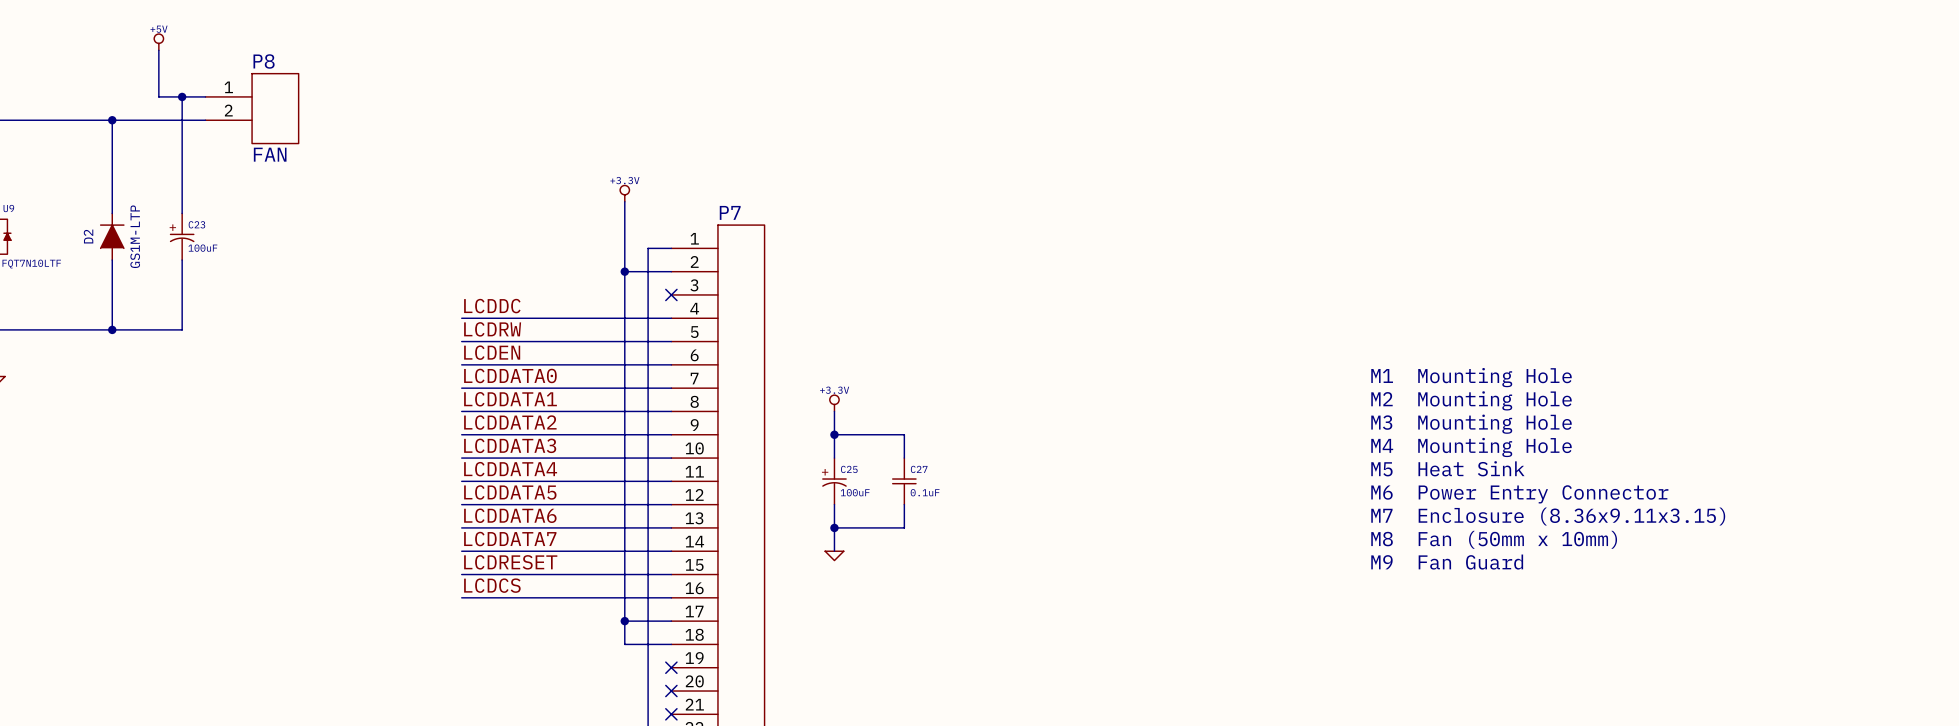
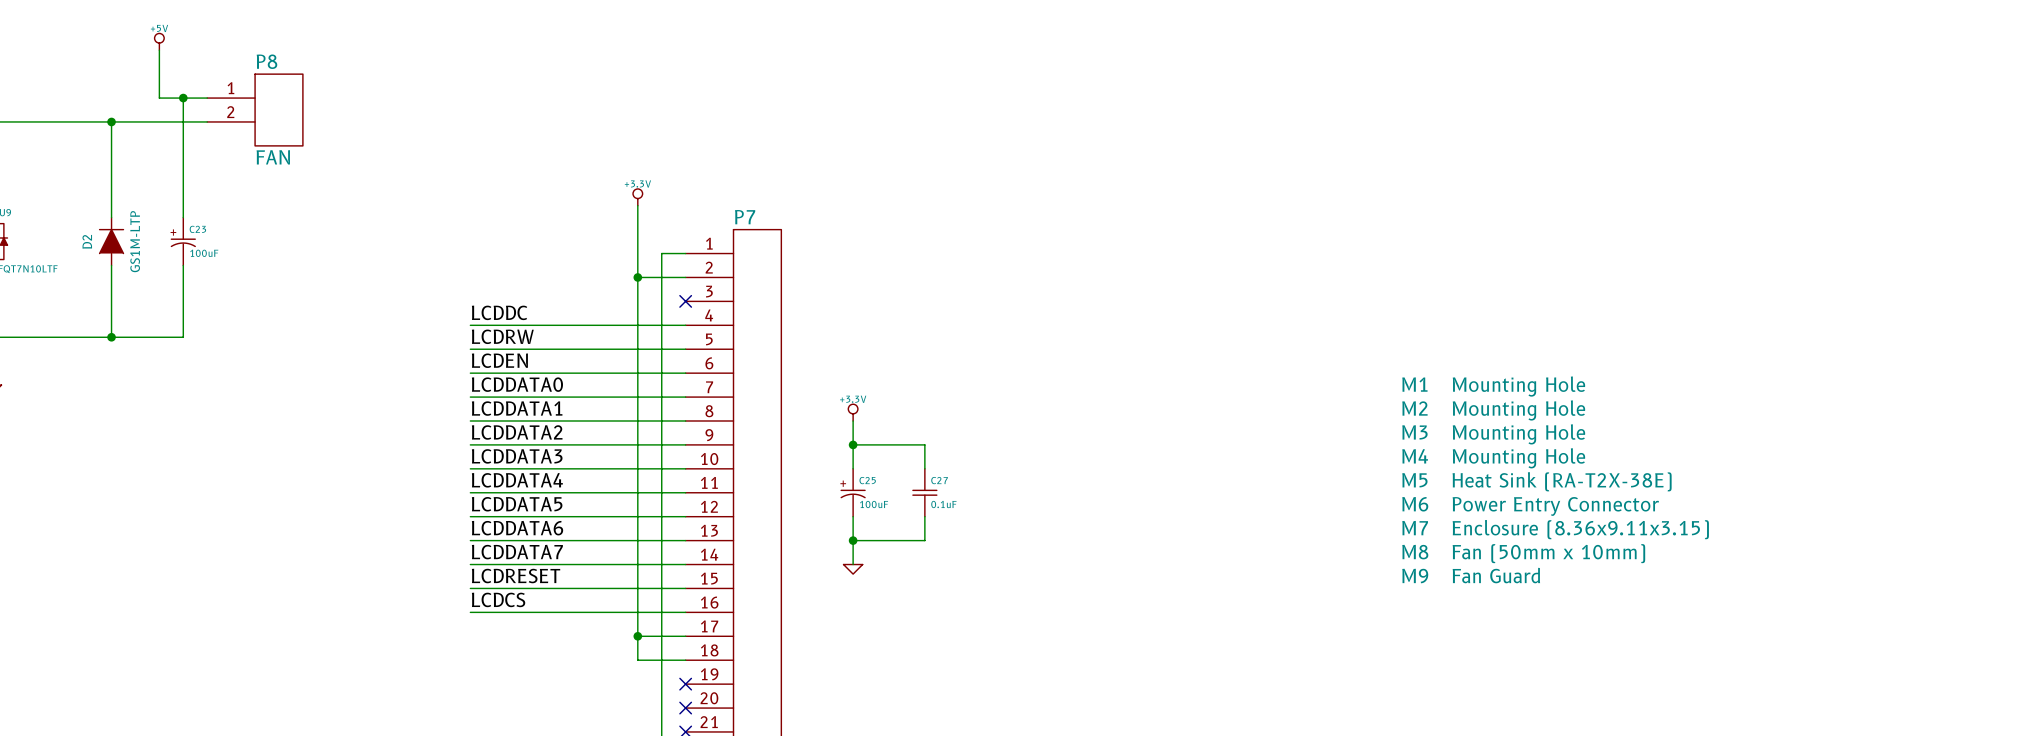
M5 position: (1447, 468) -> (1536, 481)
M5 value: Heat Sink (1471, 468) -> Heat Sink (RA-T2X-38E) (1562, 481)

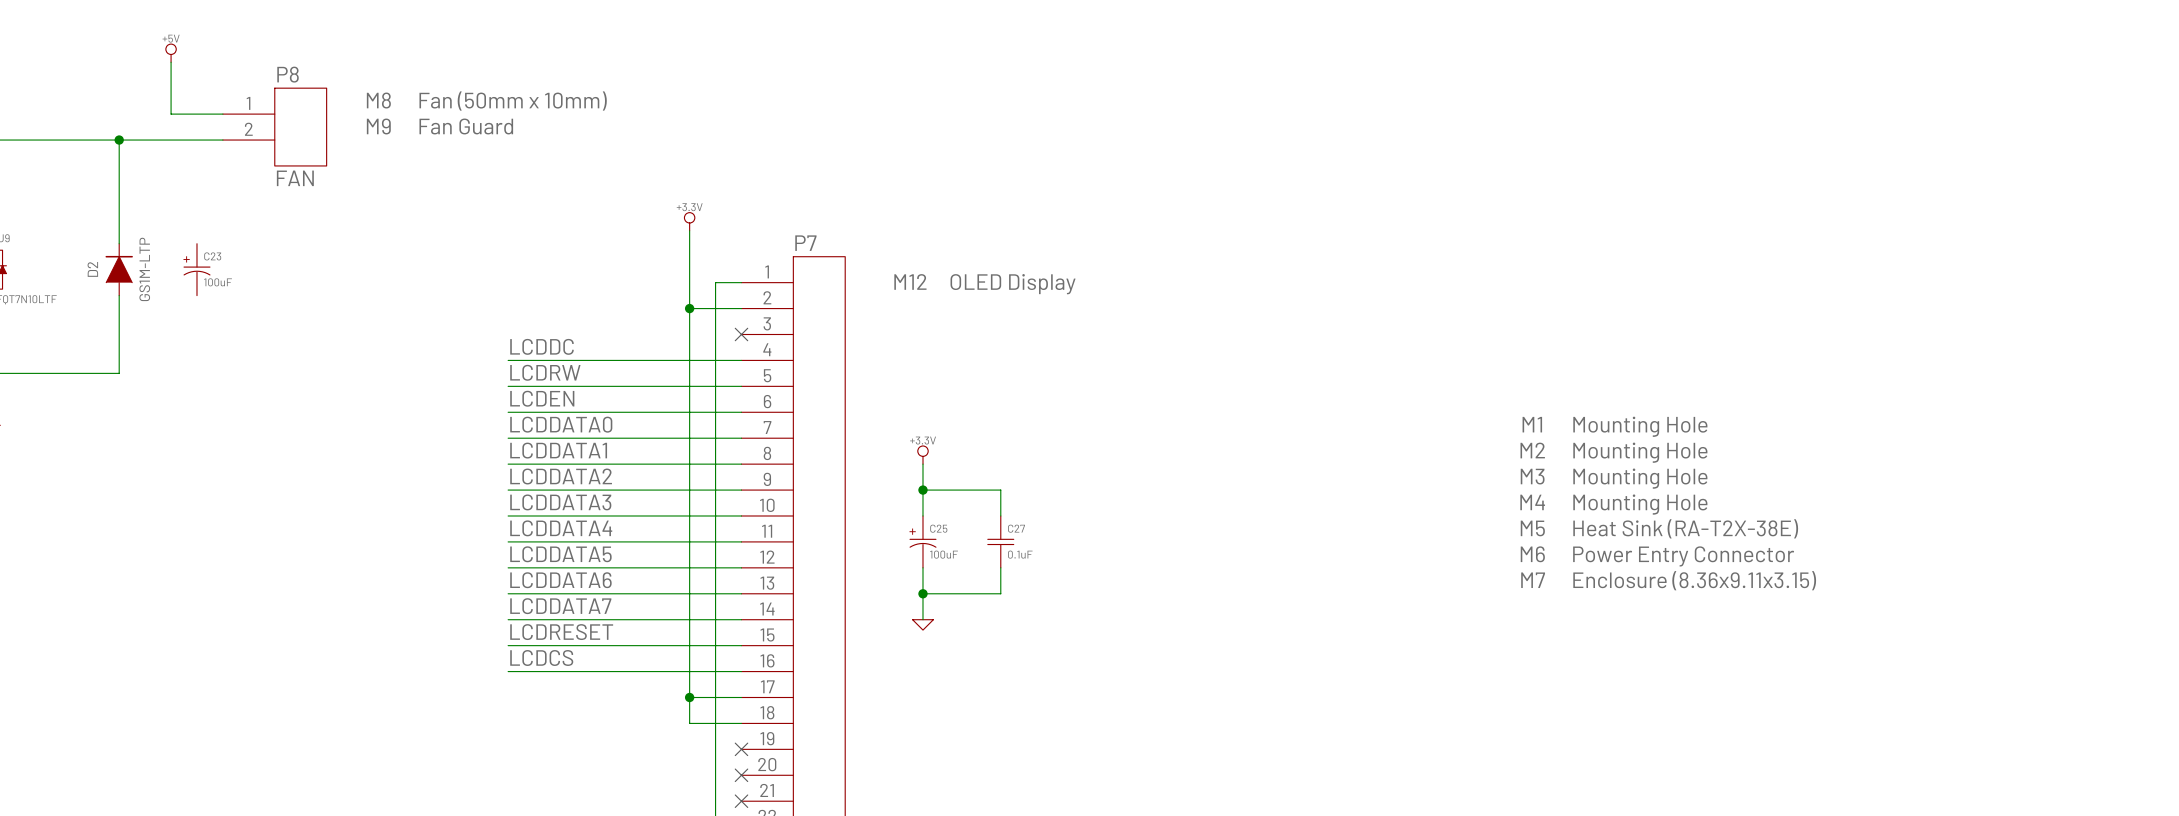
wire: (183, 98) (183, 217) -> none
junction: (183, 98) -> none
M12: none -> OLED Display (984, 284)
wire: (183, 265) (183, 337) (111, 337) -> none
junction: (111, 337) -> none
M8 position: (1523, 553) -> (486, 101)
M9 position: (1471, 575) -> (439, 126)

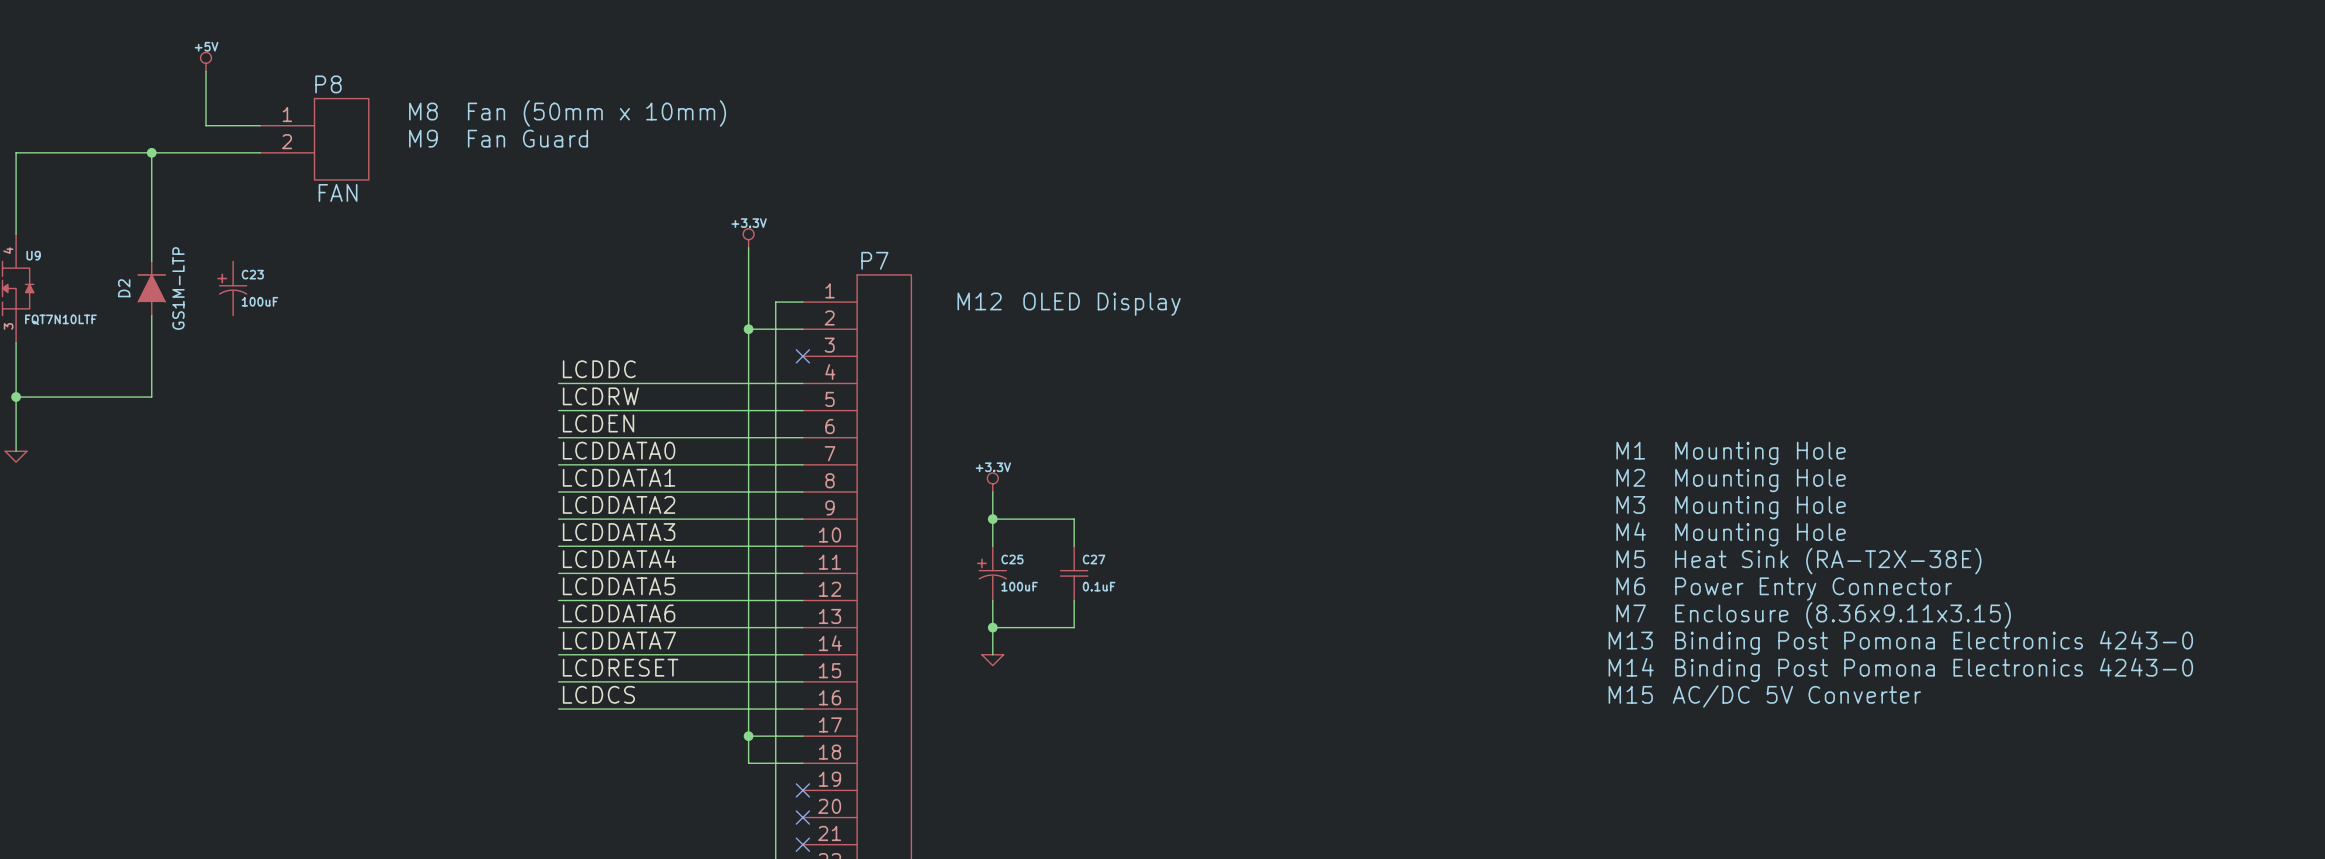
M13: none -> Binding Post Pomona Electronics 4243-0 (1900, 642)
M14: none -> Binding Post Pomona Electronics 4243-0 (1900, 670)
M15: none -> AC/DC 5V Converter (1764, 696)

